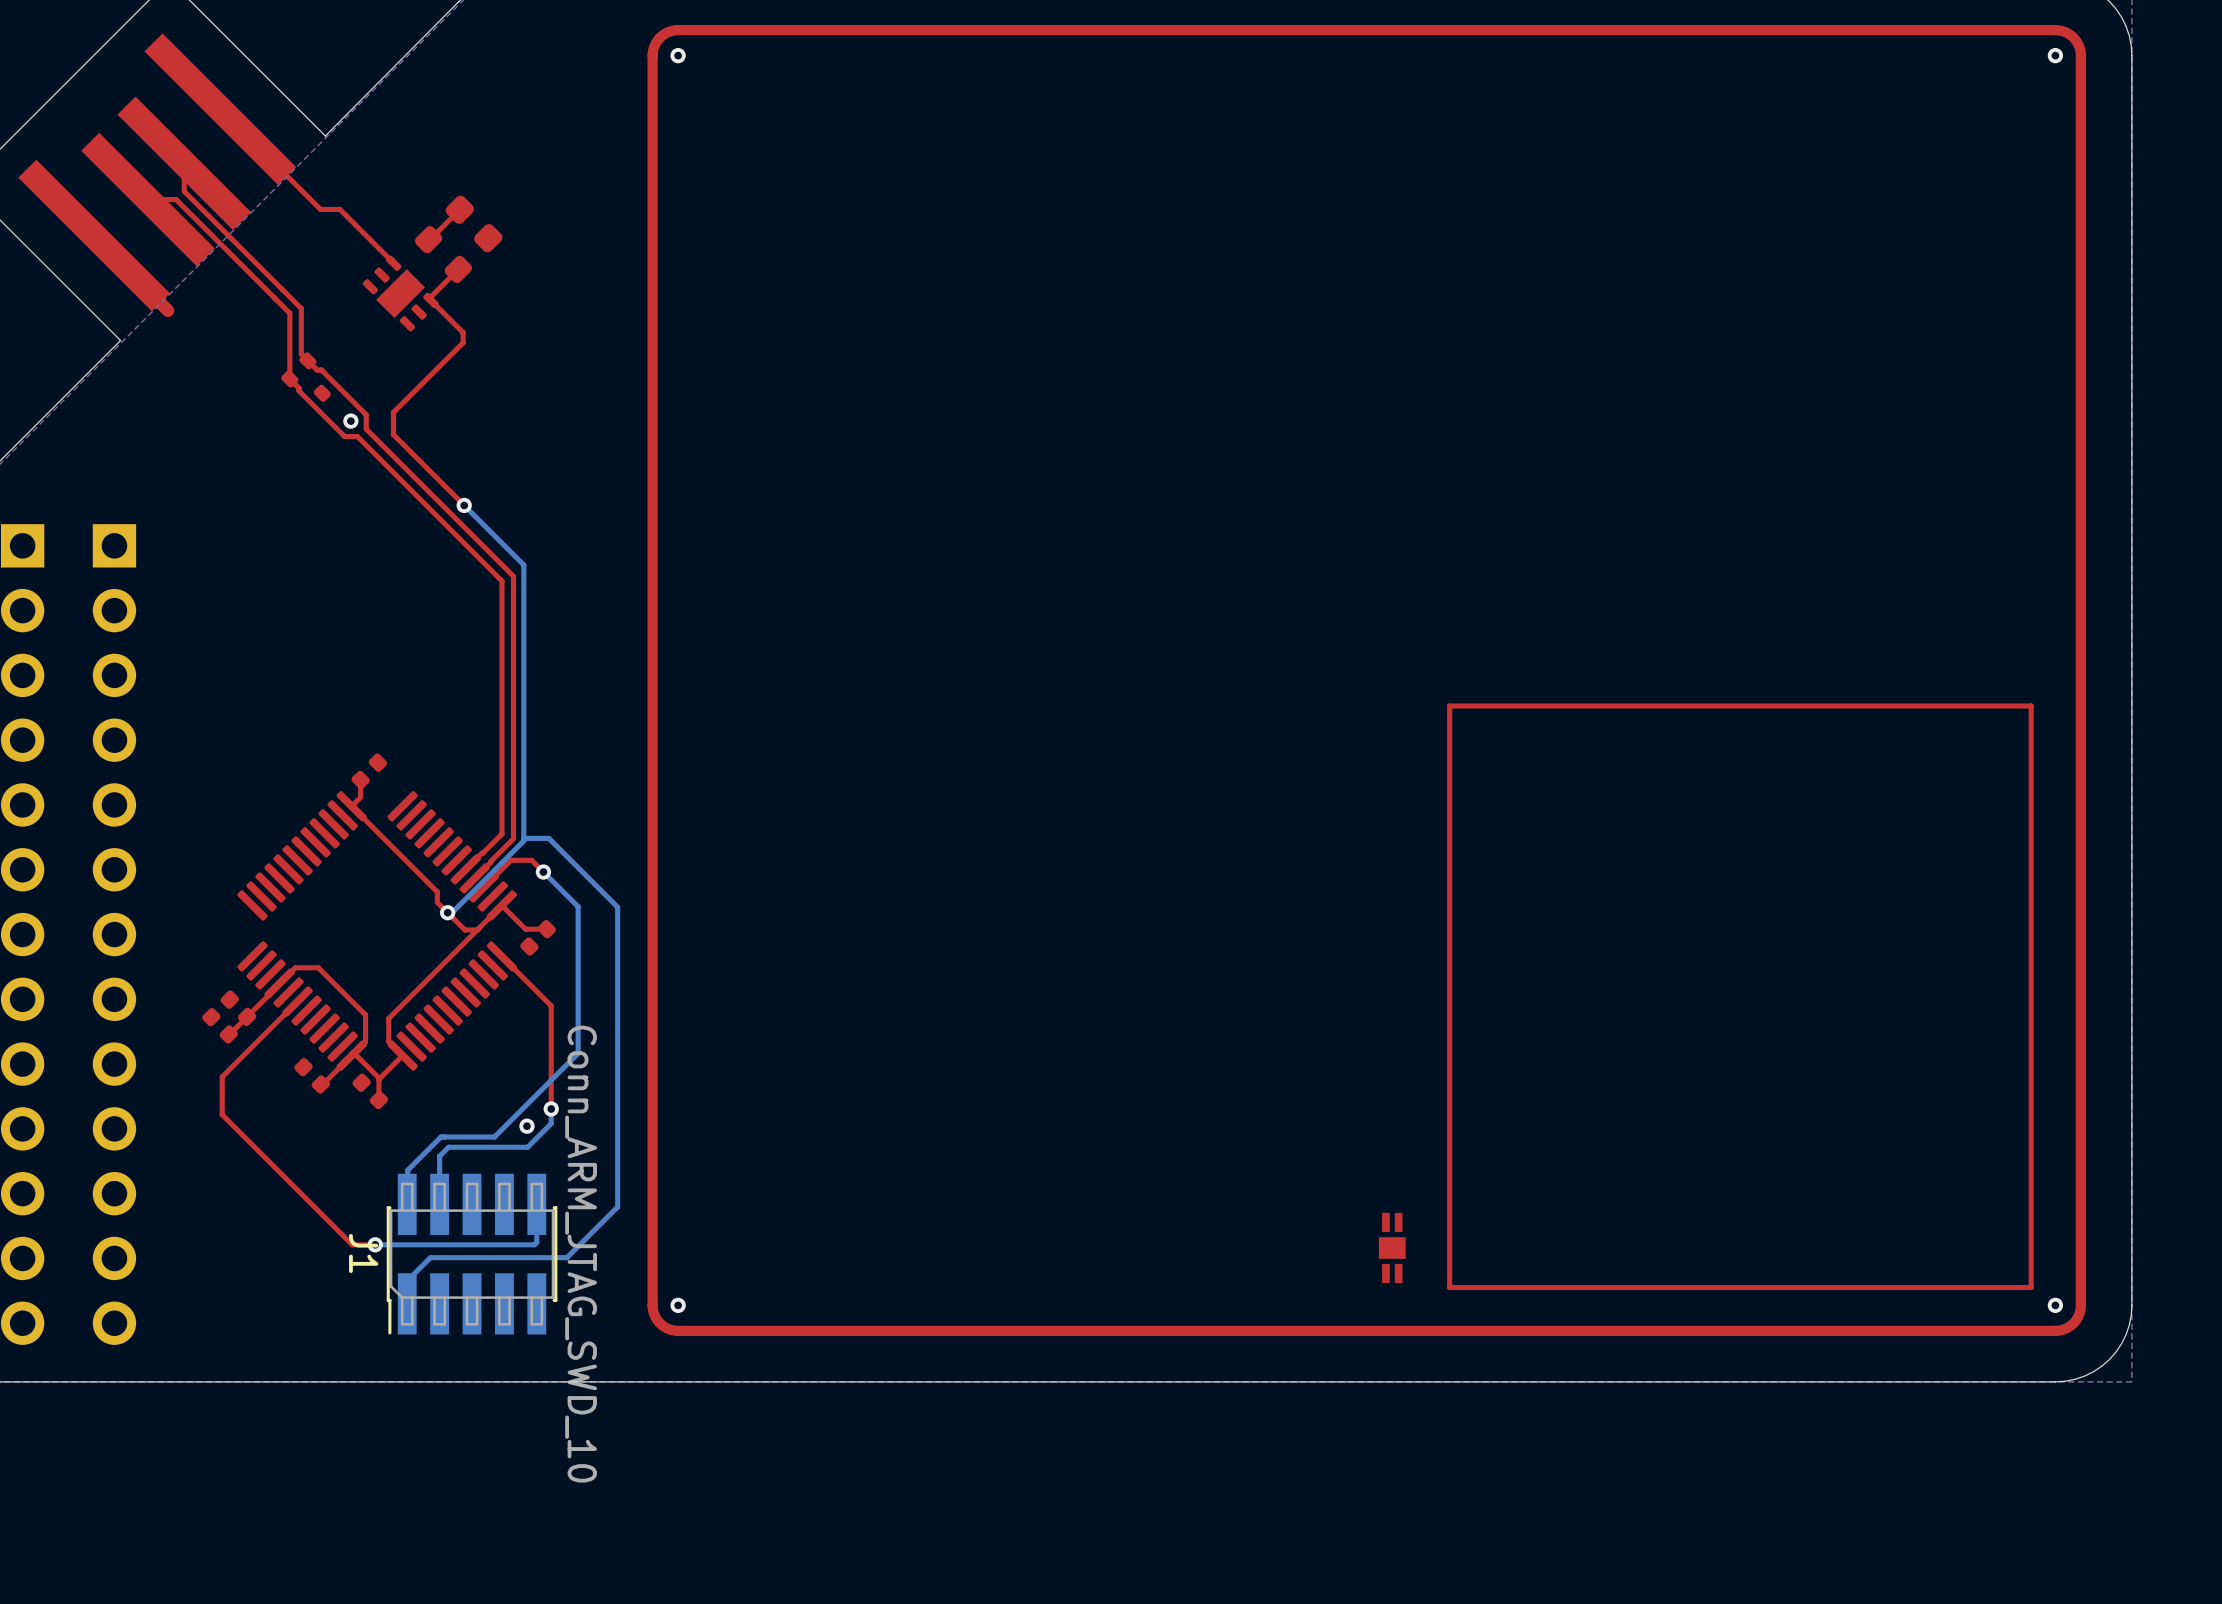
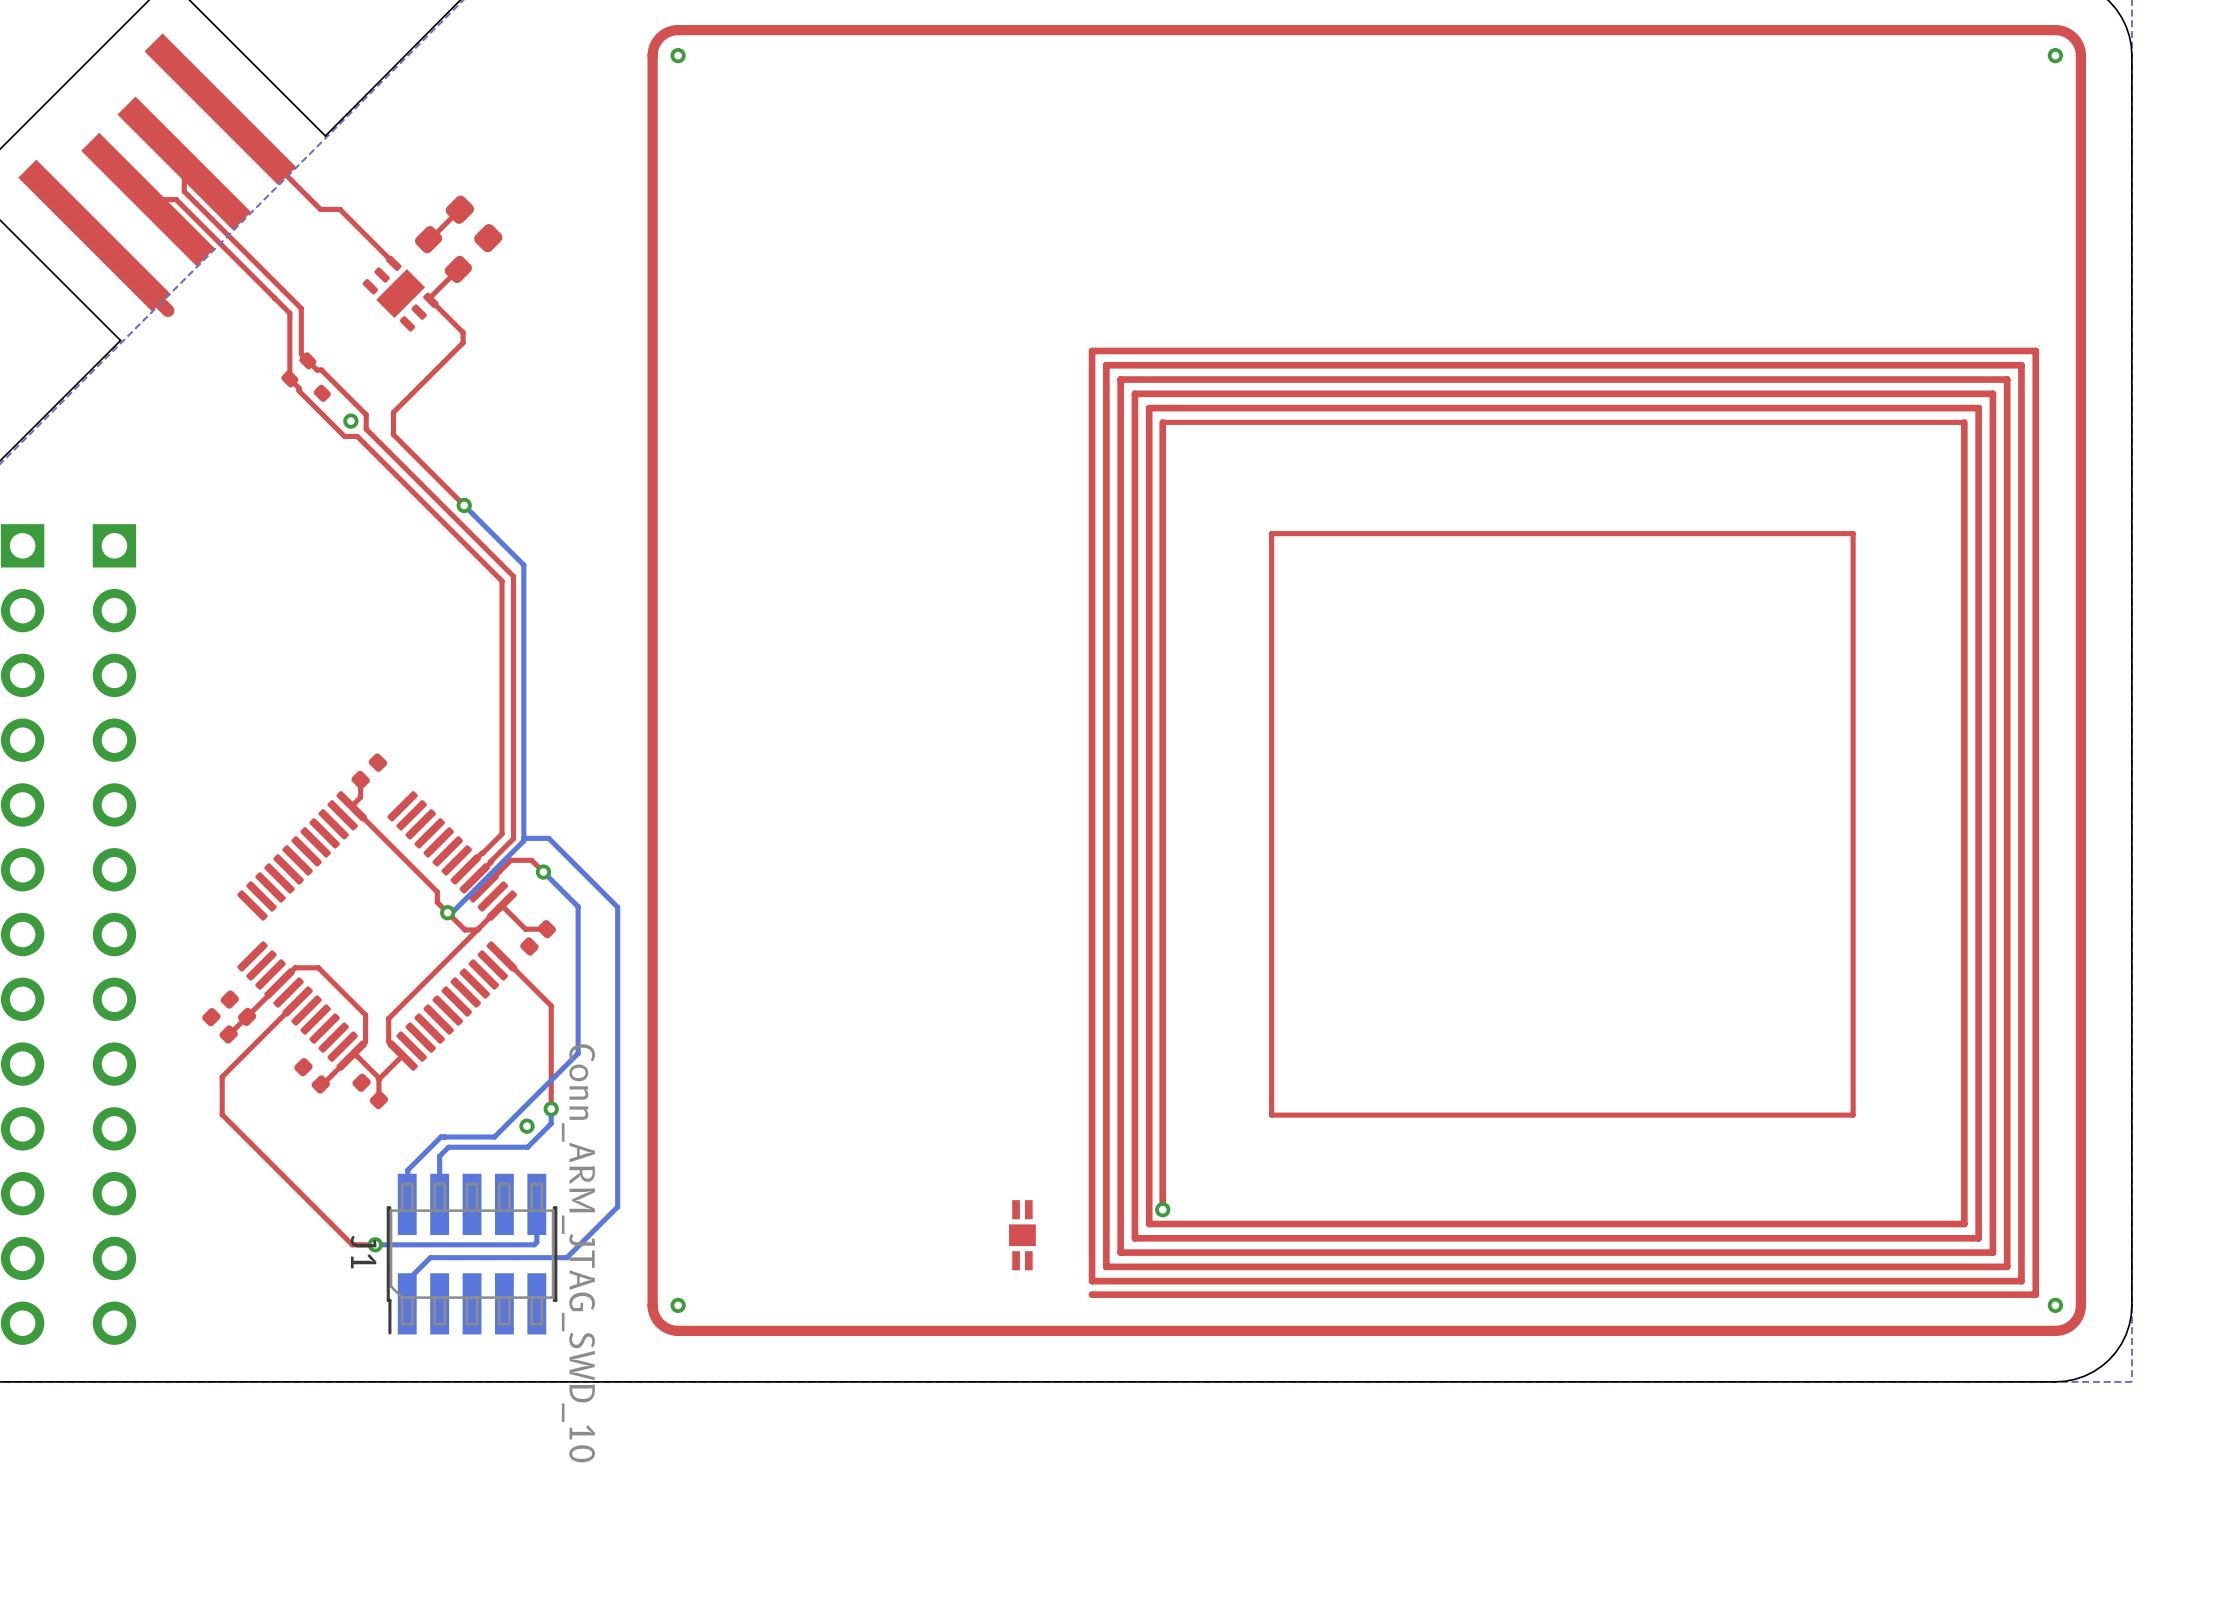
top track: (2031, 706) (1449, 706) (1449, 1287) (2031, 1287) (2031, 706) -> (1853, 533) (1271, 533) (1271, 1115) (1853, 1115) (1853, 533)
part: none -> (1563, 822)
part position: (1392, 1247) -> (1022, 1235)

